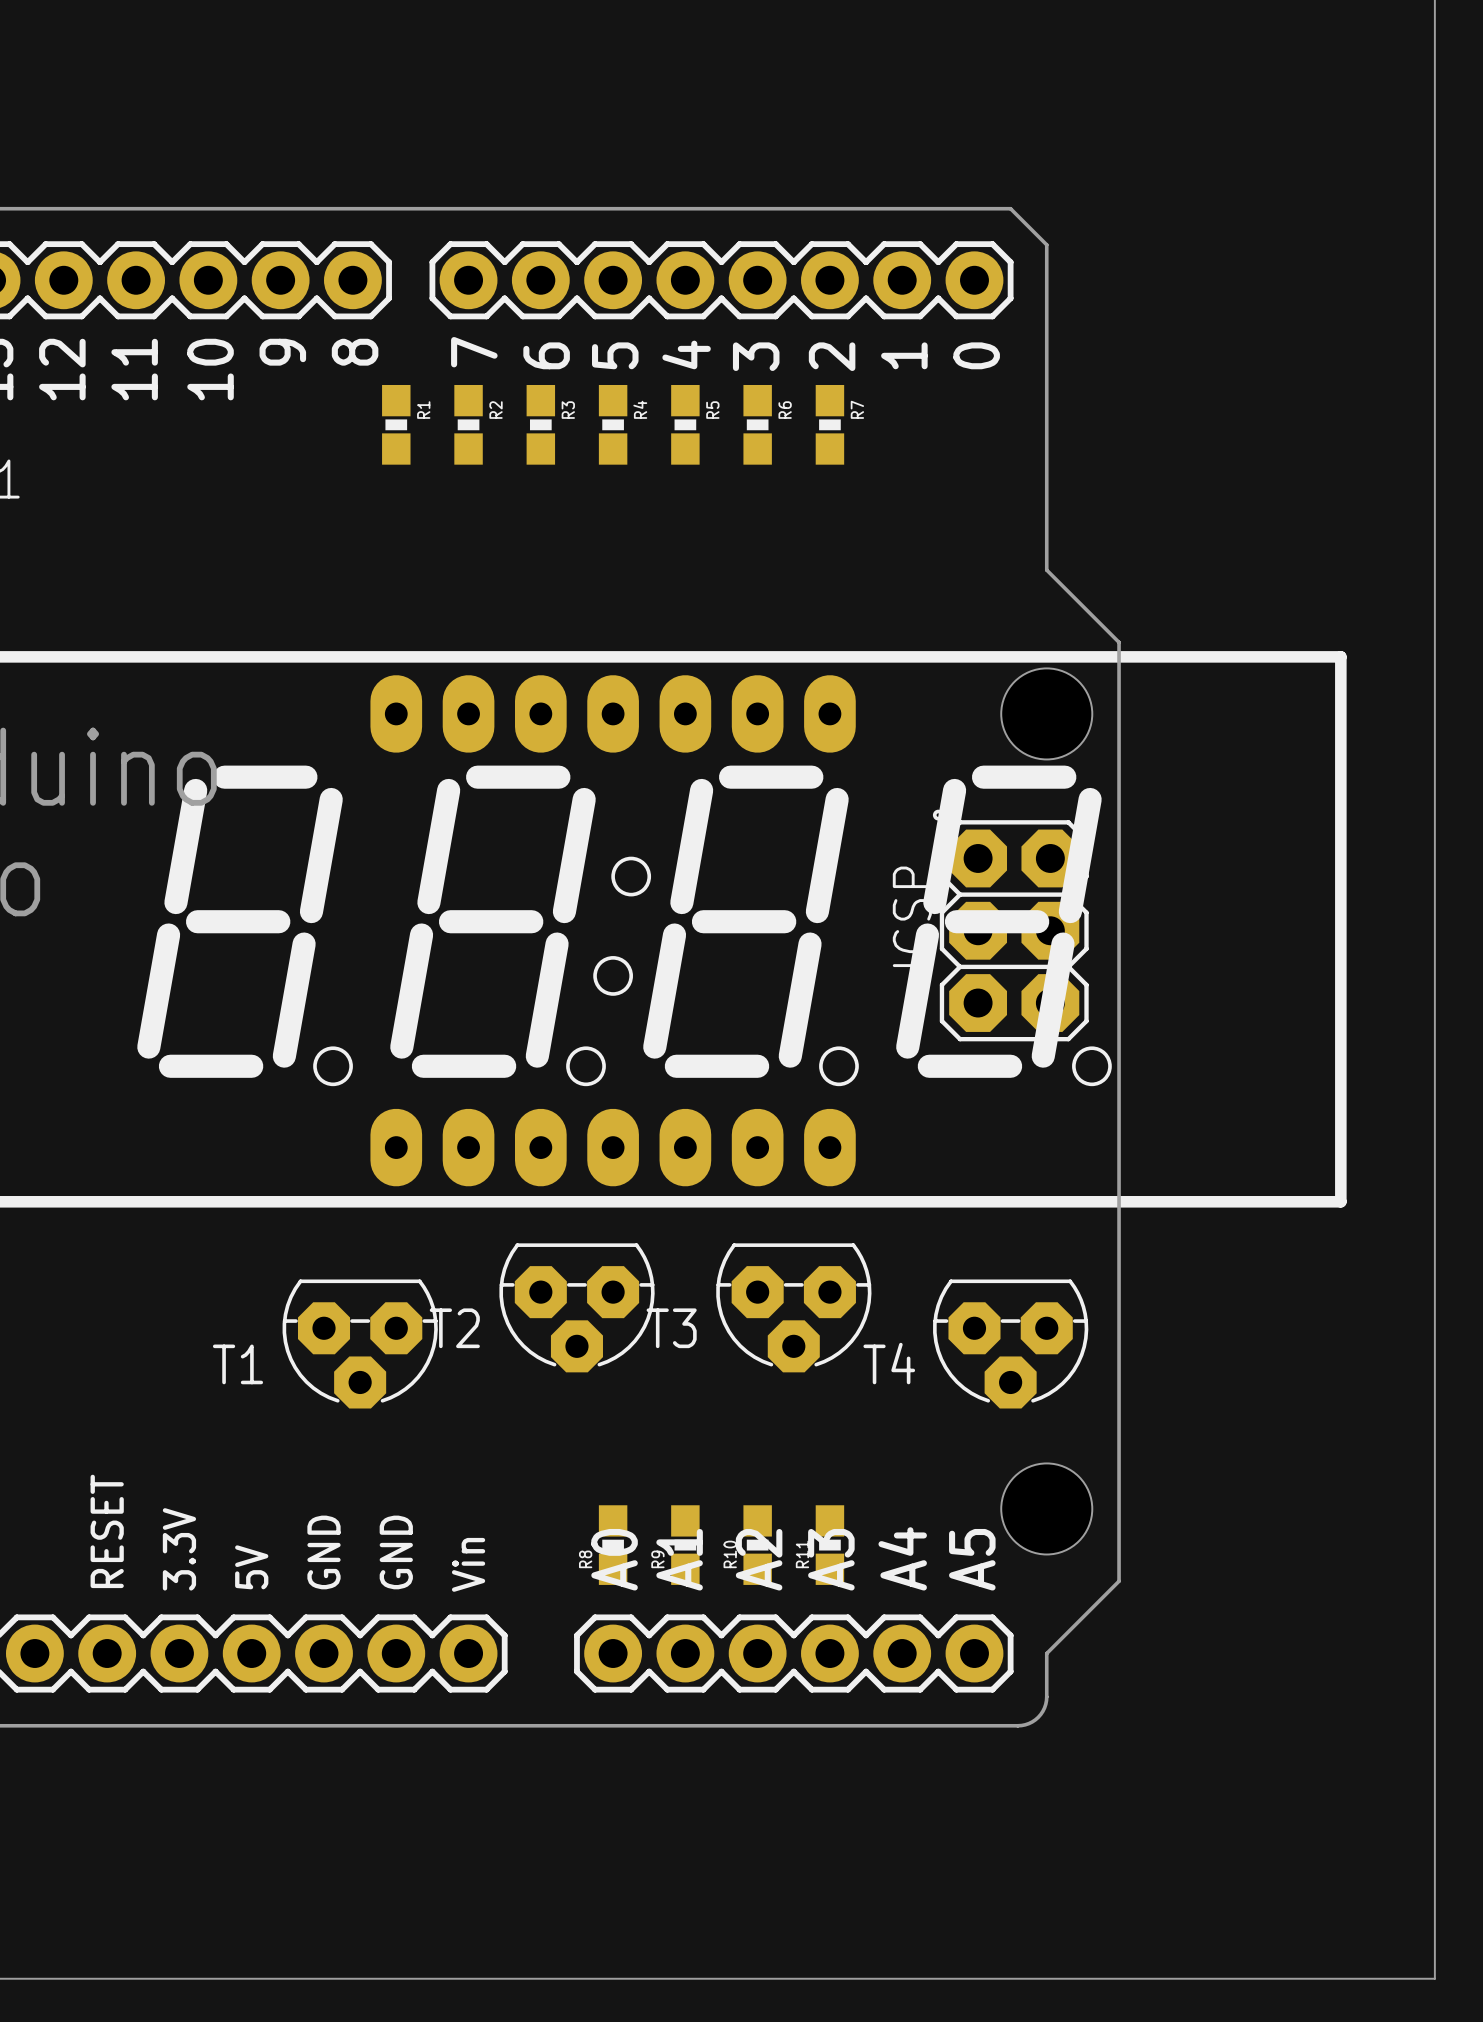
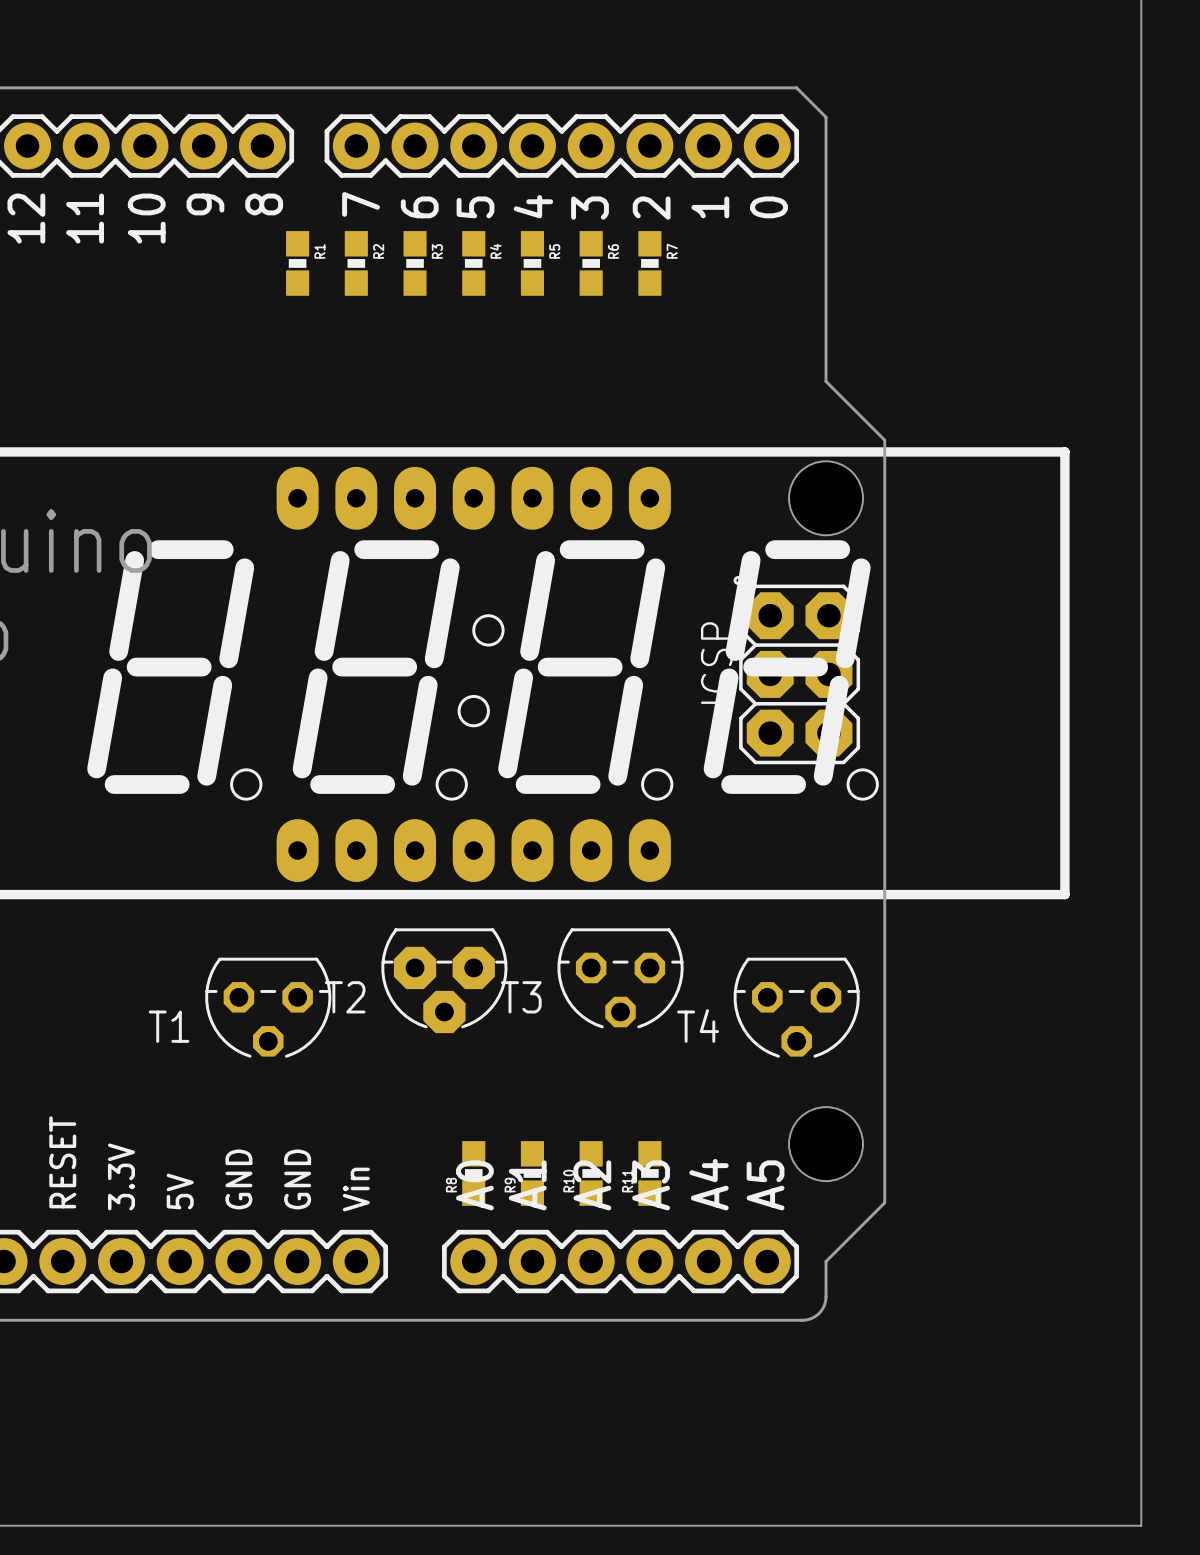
T3 footprint: [716, 1243, 872, 1373] -> [557, 928, 684, 1029]
T1 footprint: [282, 1279, 438, 1409] -> [205, 957, 332, 1058]
T4 footprint: [933, 1279, 1089, 1409] -> [733, 957, 860, 1058]

